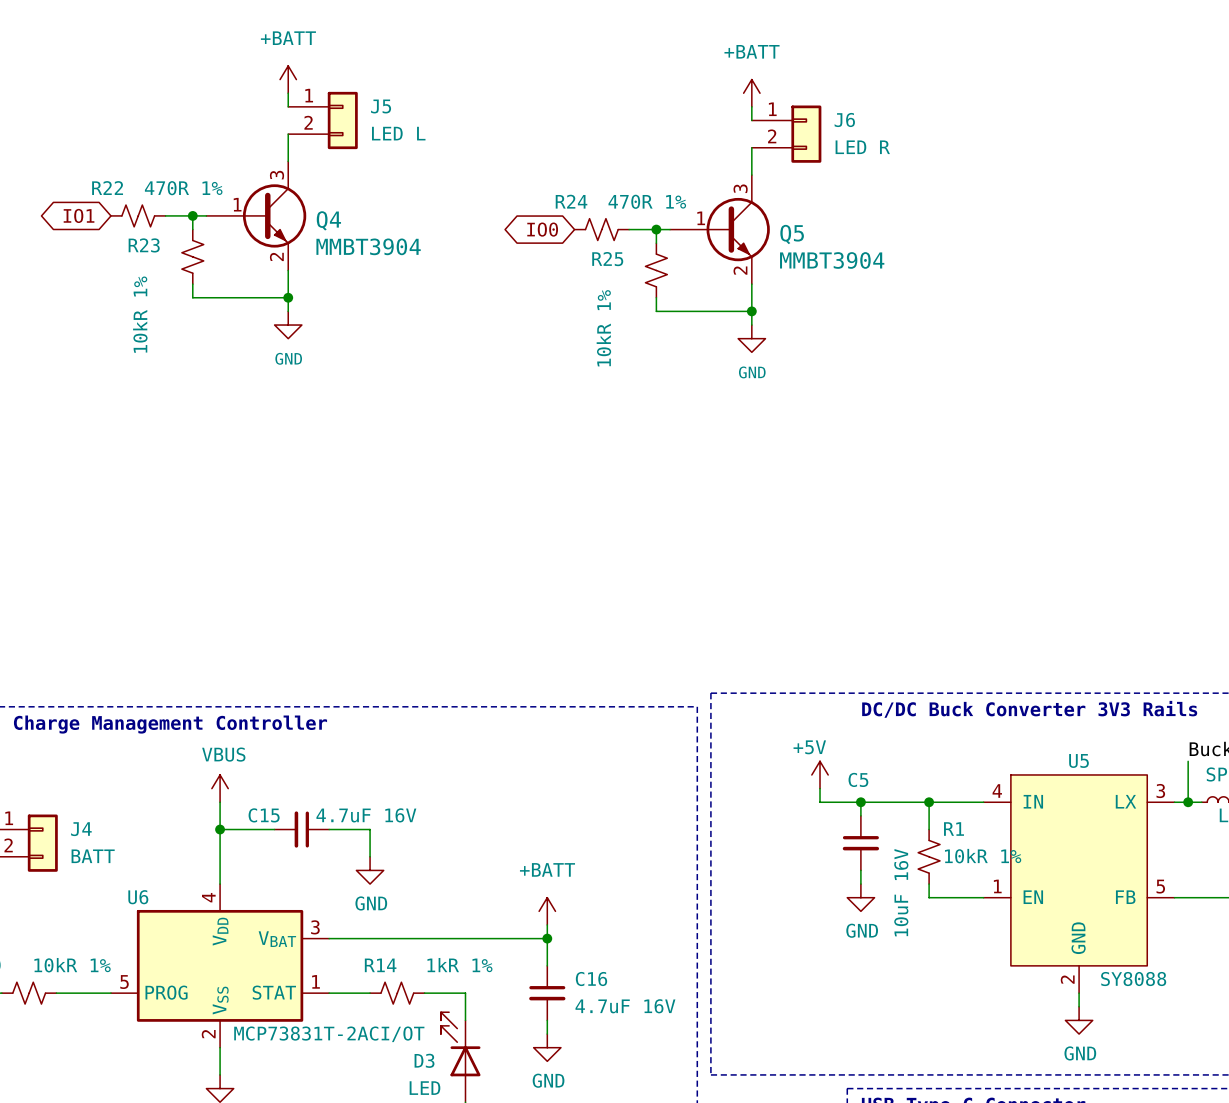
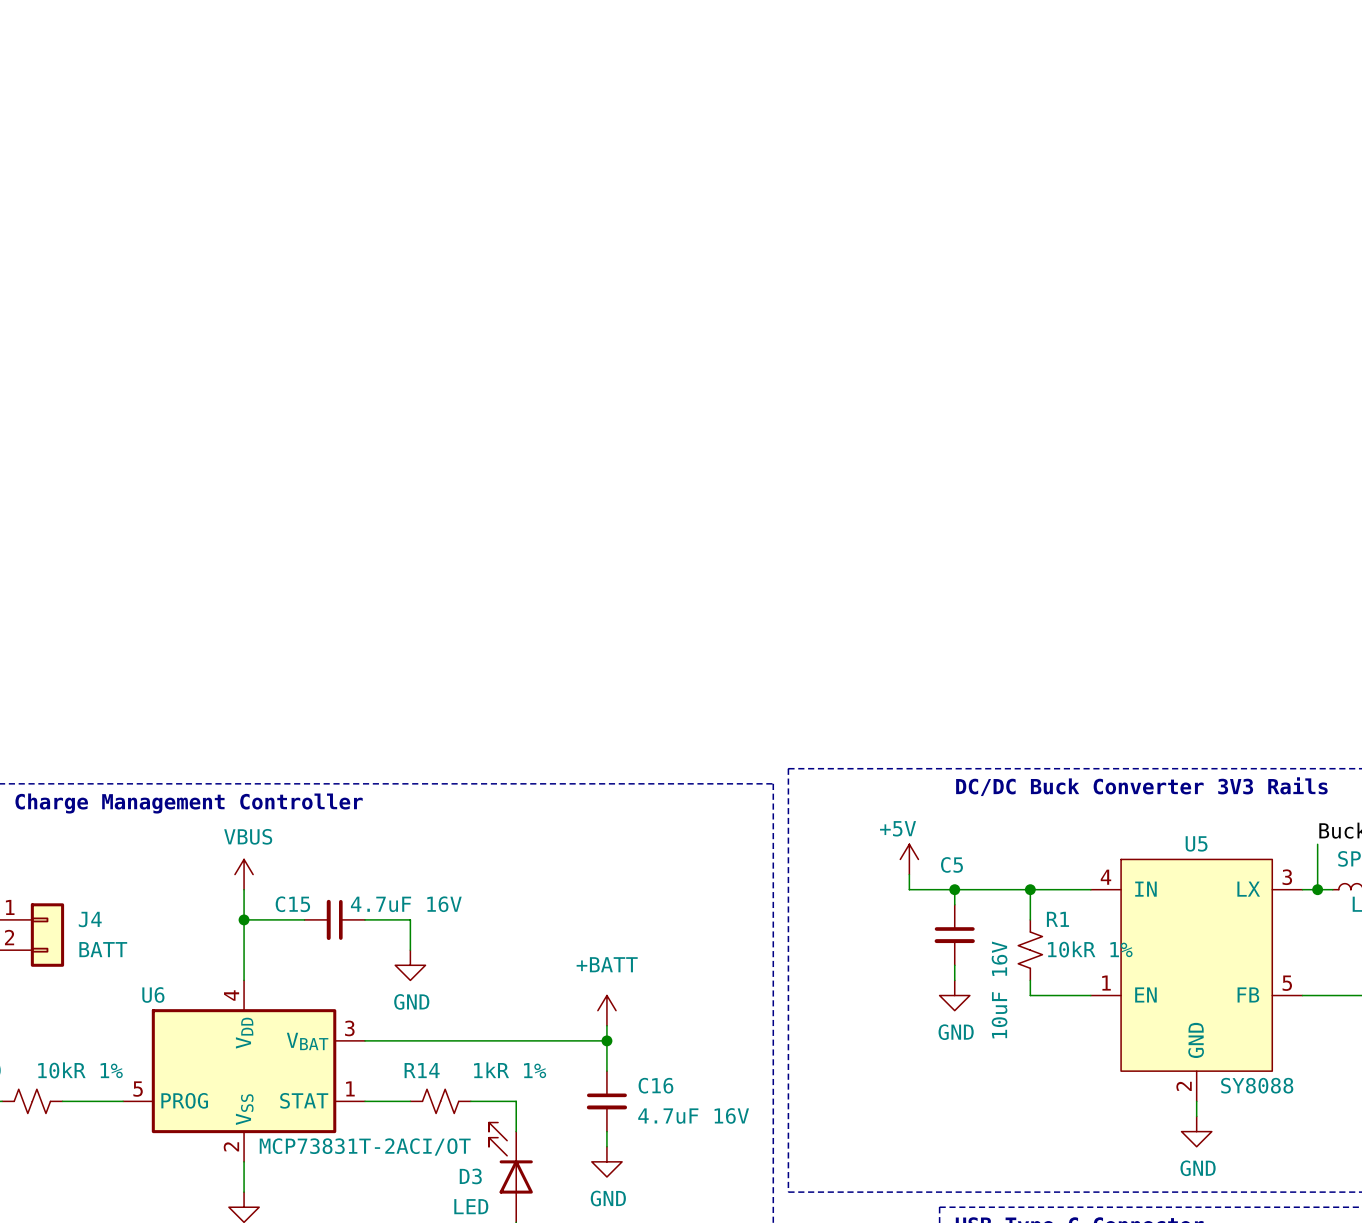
power symbol: +BATT (288, 79) -> none
wire: (288, 93) (288, 106) -> none
power symbol: +BATT (751, 93) -> none
wire: (751, 106) (751, 120) -> none
J5: LED L (323, 120) -> none
wire: (288, 134) (288, 161) -> none
J6: LED R (786, 134) -> none
wire: (751, 147) (751, 175) -> none
global label: IO1 (79, 215) -> none
R22: 470R 1% (138, 215) -> none
wire: (165, 215) (206, 215) -> none
wire: (192, 215) (192, 229) -> none
junction: (192, 215) -> none
Q4: MMBT3904 (256, 215) -> none
global label: IO0 (542, 229) -> none
R24: 470R 1% (601, 229) -> none
wire: (629, 229) (670, 229) -> none
wire: (656, 229) (656, 243) -> none
junction: (656, 229) -> none
Q5: MMBT3904 (719, 229) -> none
R23: 10kR 1% (192, 256) -> none
wire: (288, 270) (288, 311) -> none
R25: 10kR 1% (656, 270) -> none
wire: (192, 284) (192, 297) (288, 297) -> none
wire: (751, 284) (751, 325) -> none
junction: (288, 297) -> none
wire: (656, 297) (656, 311) (751, 311) -> none
junction: (751, 311) -> none
power symbol: GND (288, 325) -> none
power symbol: GND (751, 338) -> none

